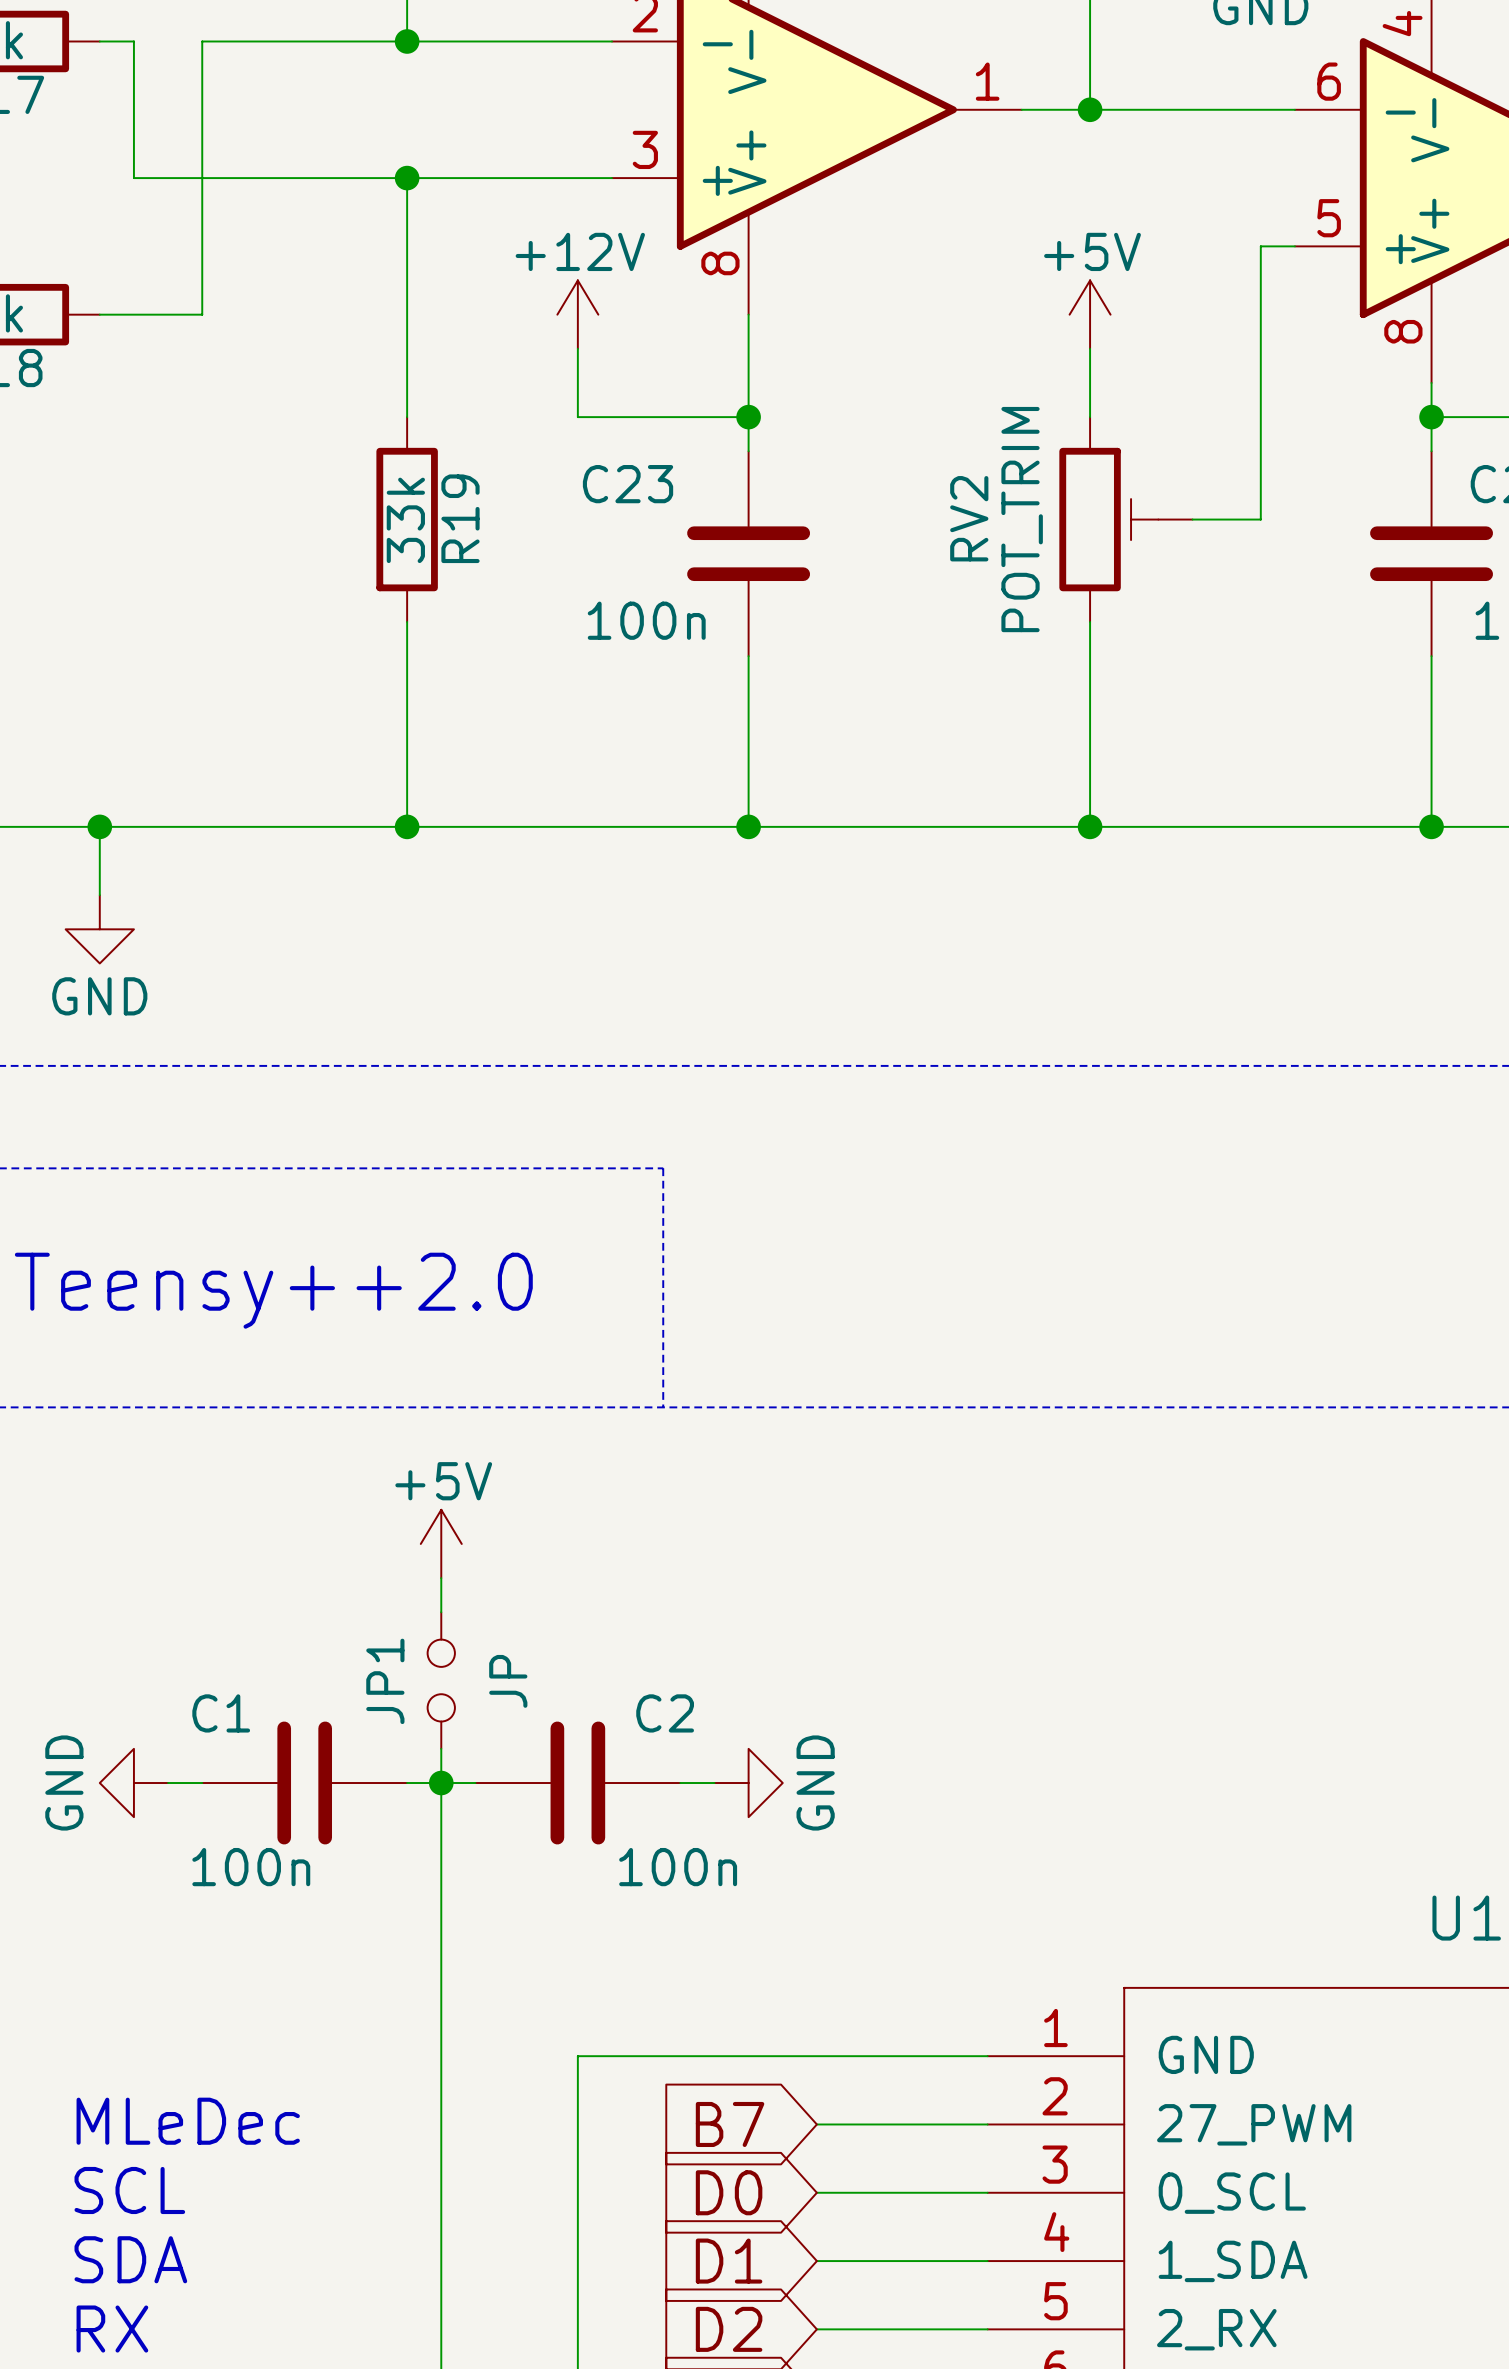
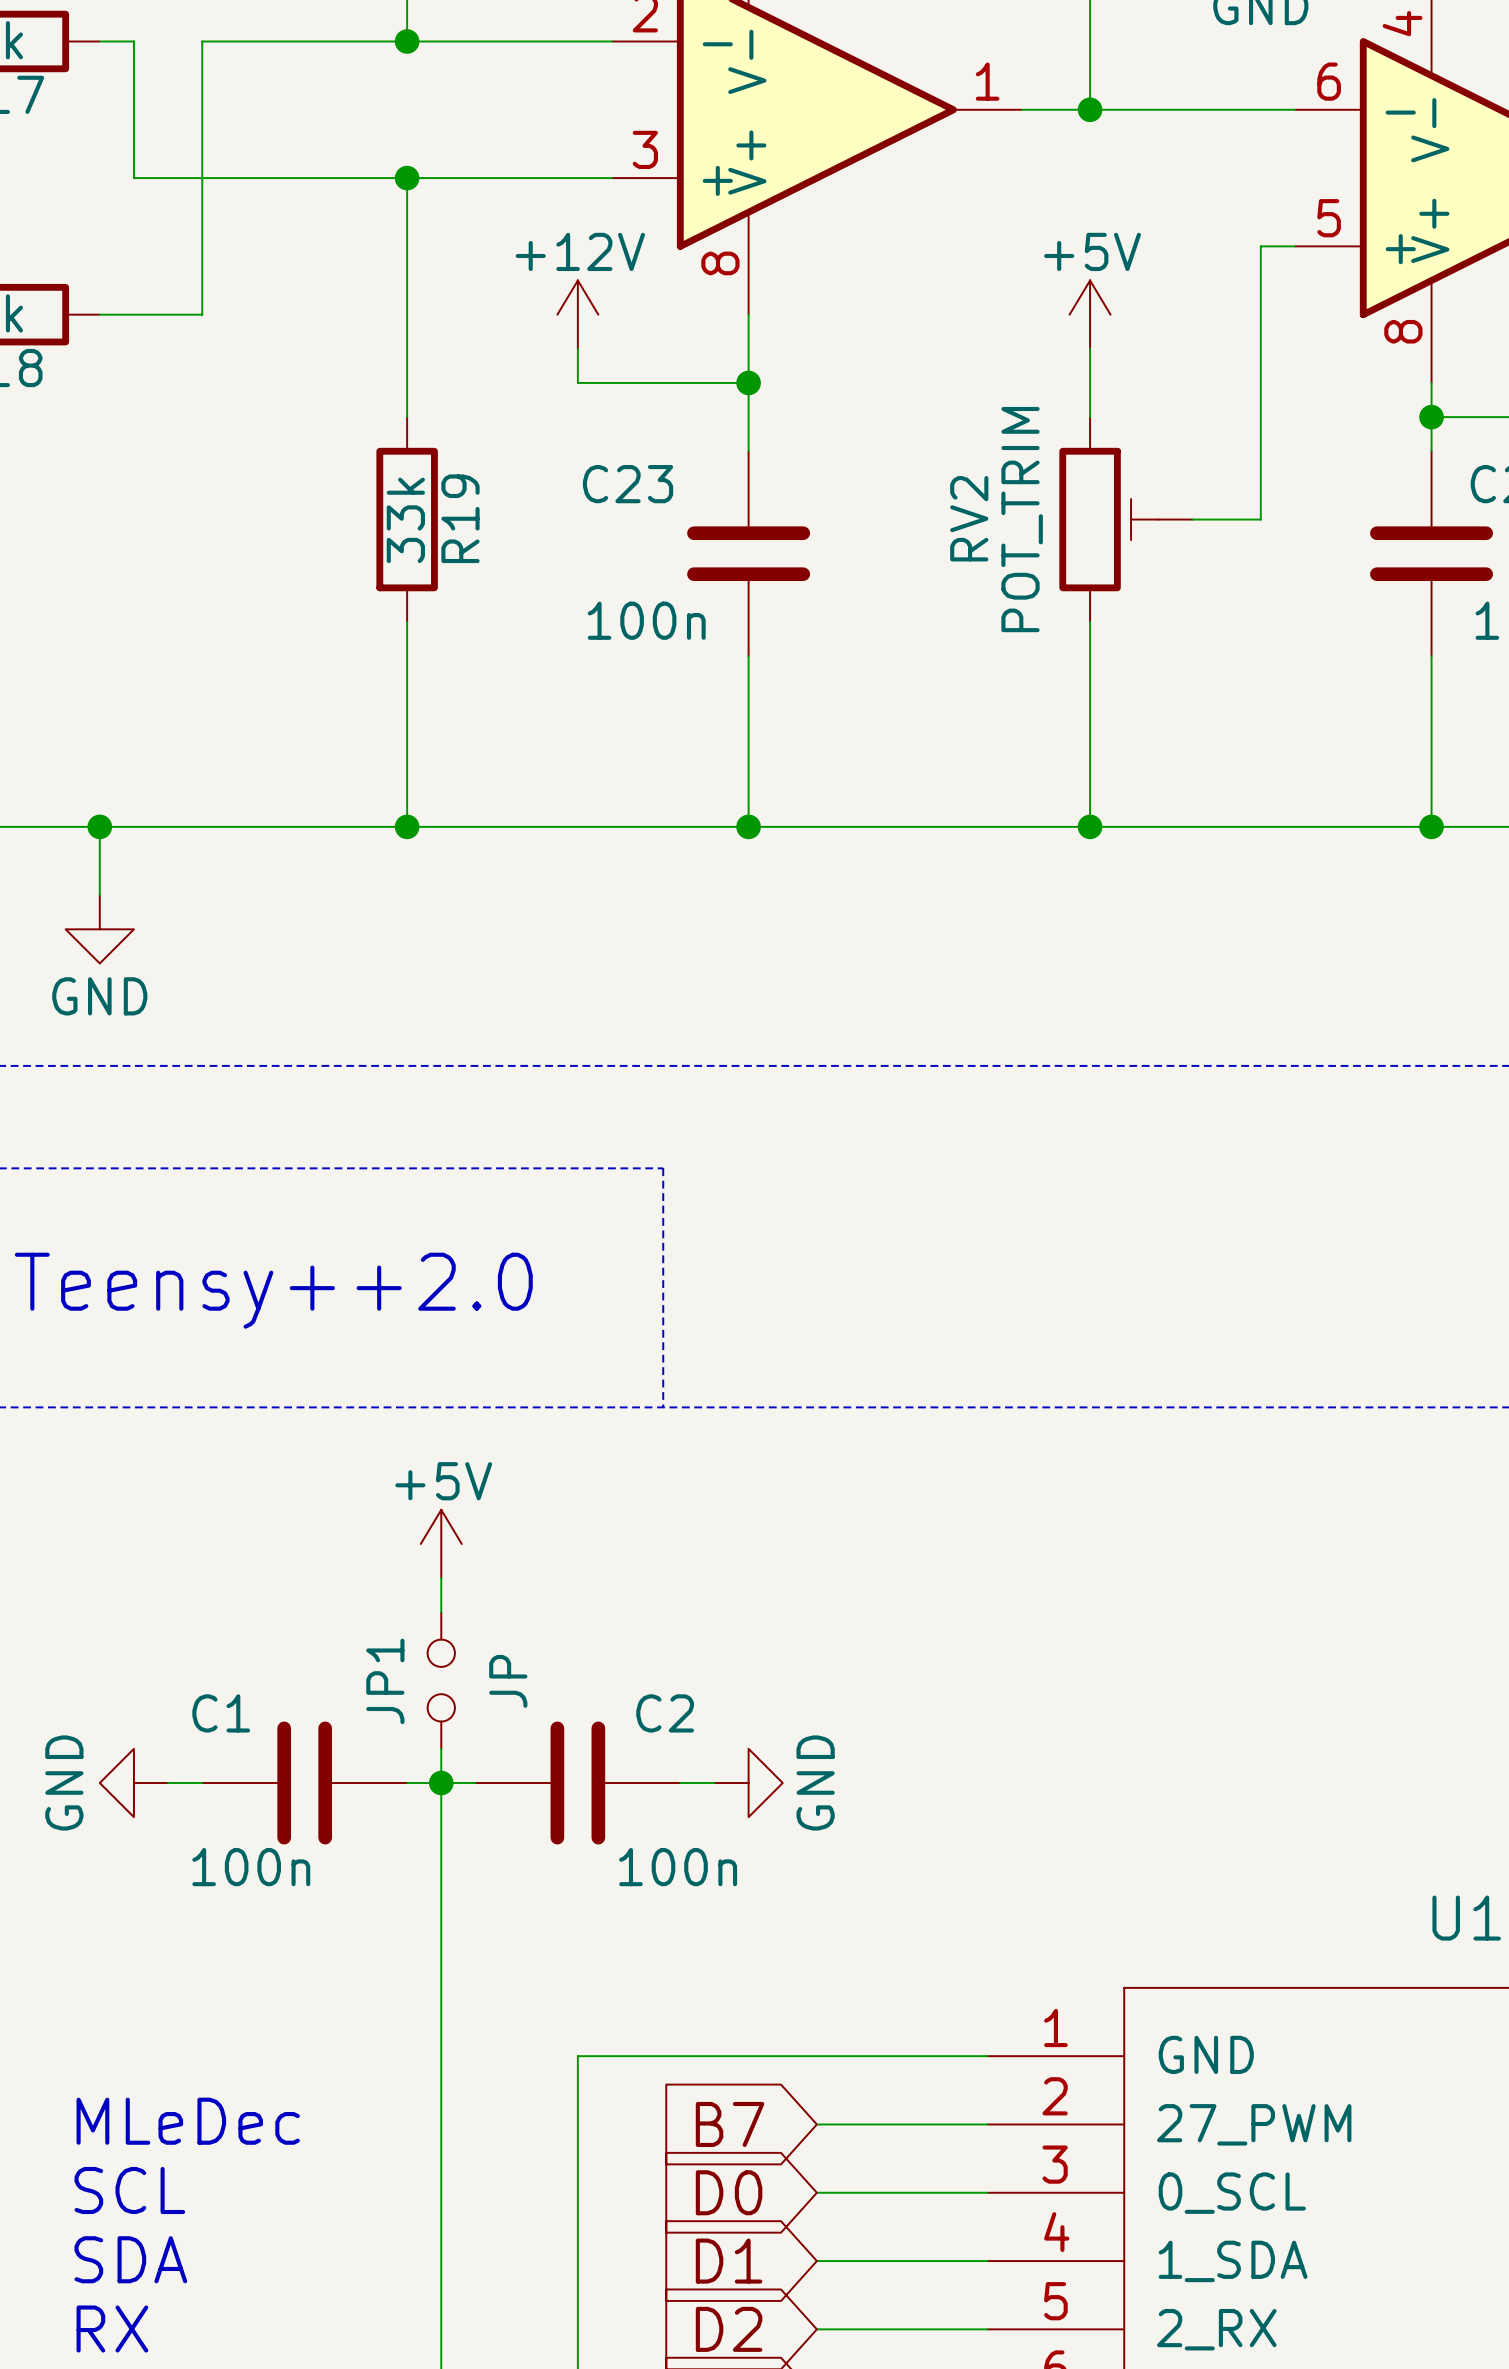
wire: (577, 382) (577, 417) (748, 417) -> (577, 382) (748, 382)
junction position: (748, 417) -> (748, 382)

